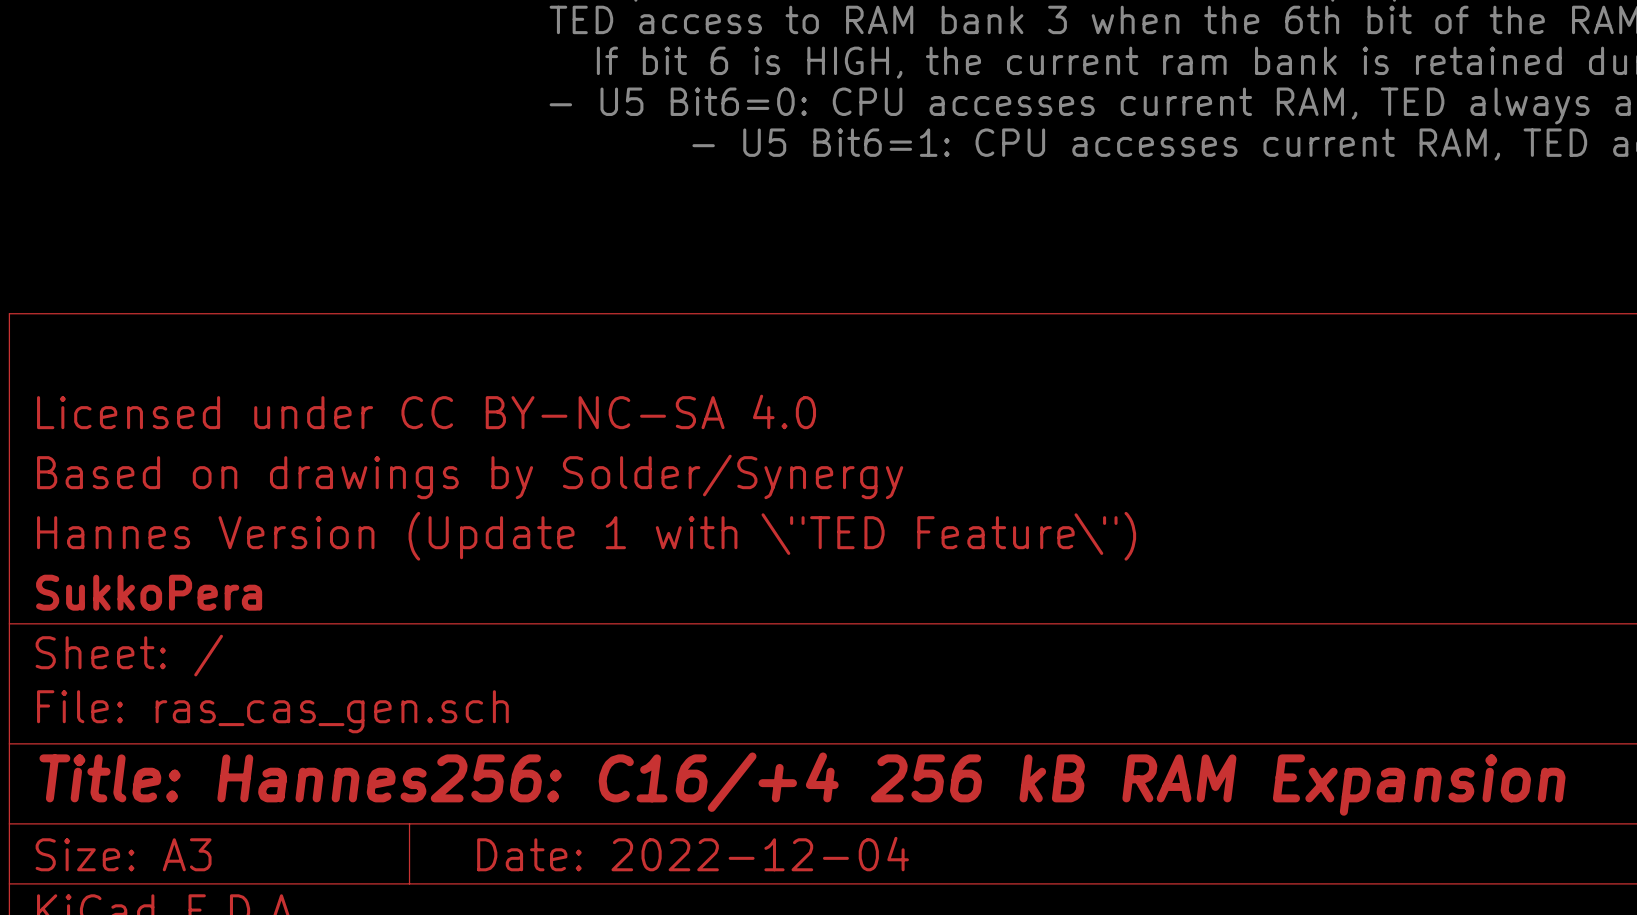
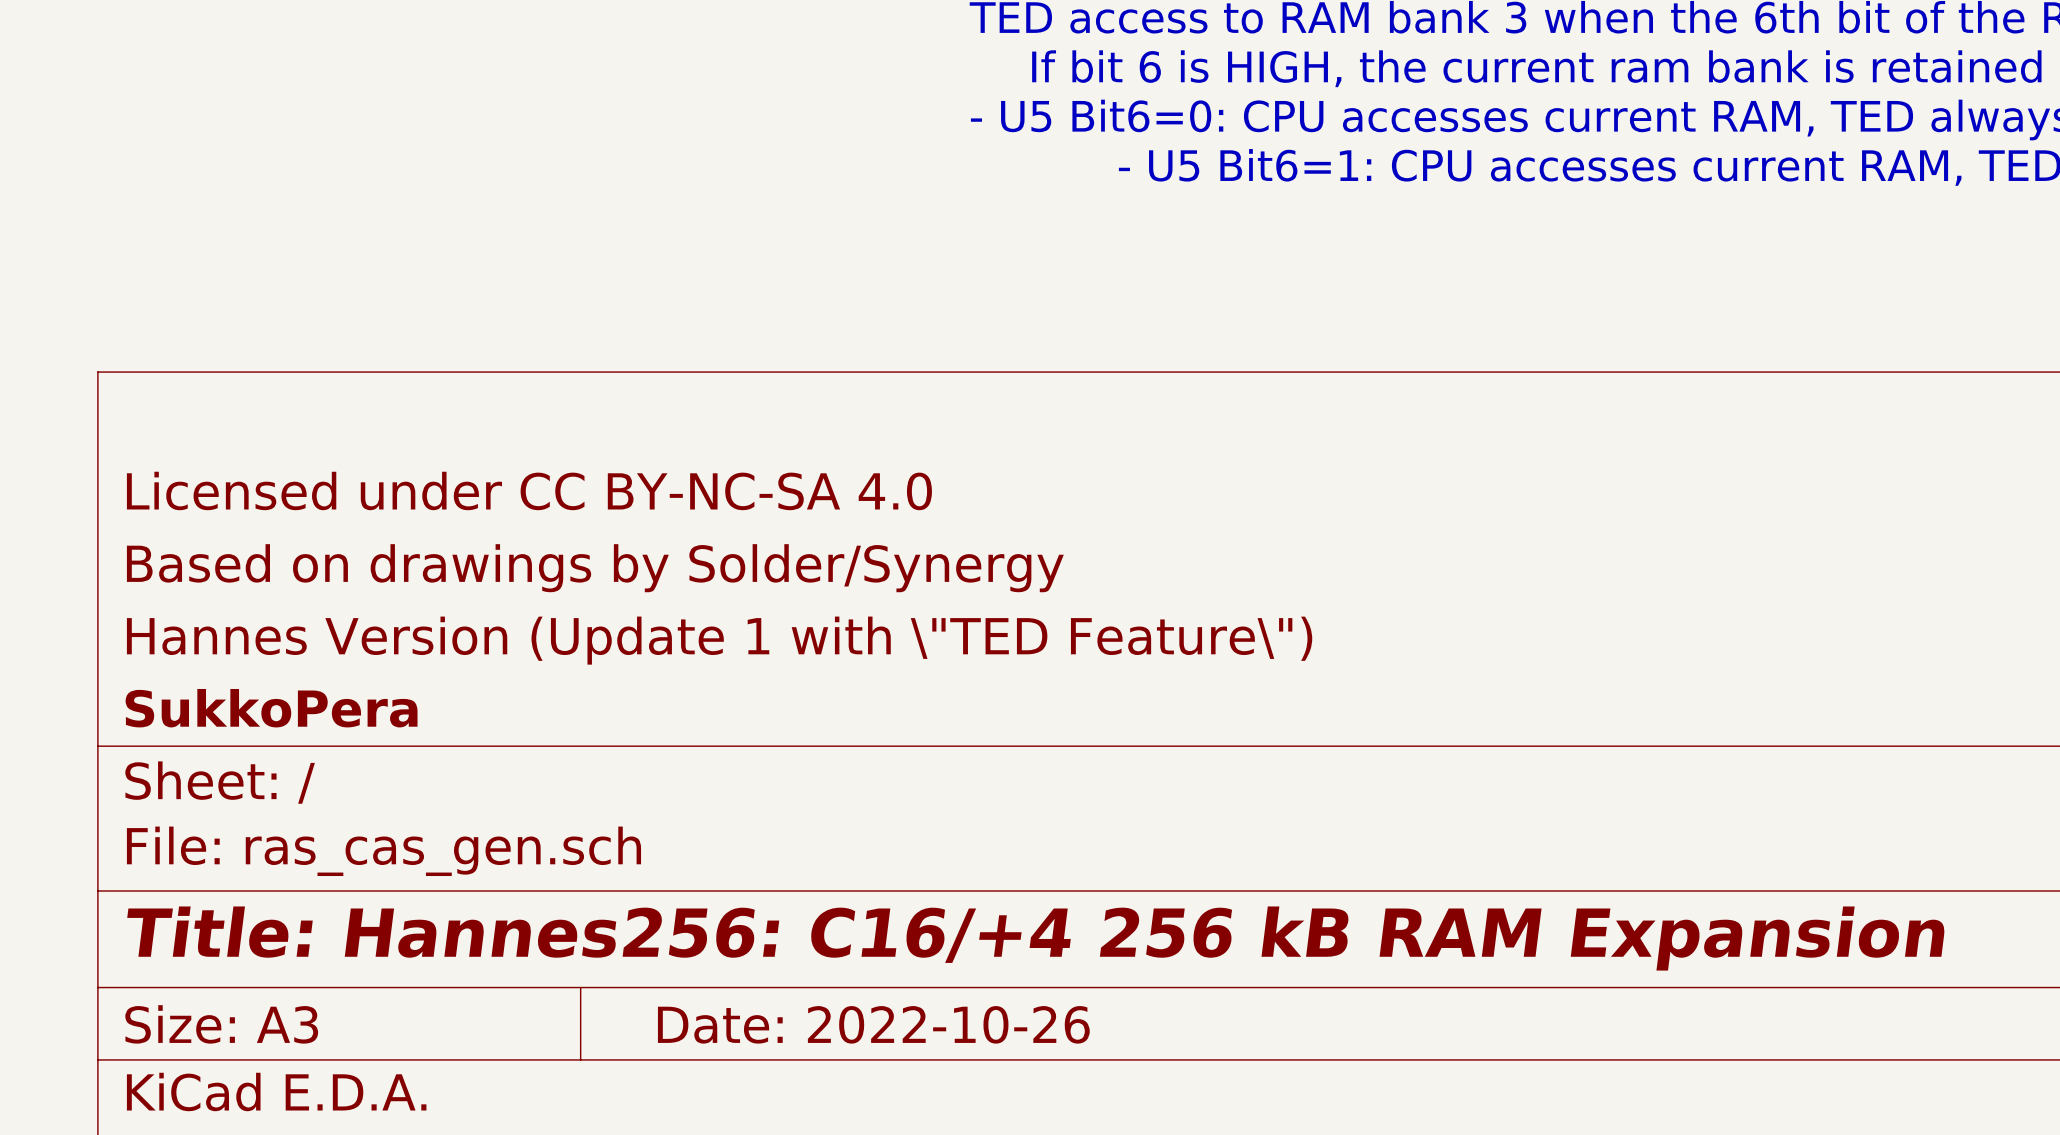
title block: Date: 2022-12-04 (693, 854) -> Date: 2022-10-26 (873, 1024)

